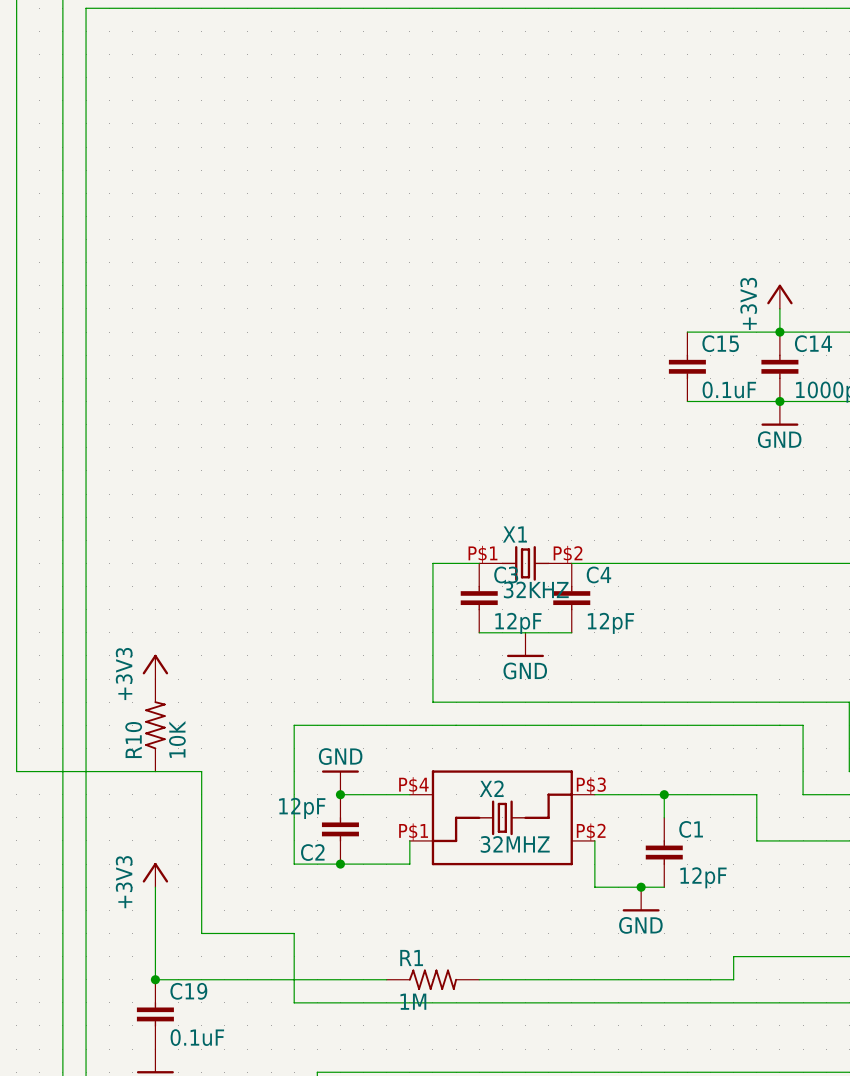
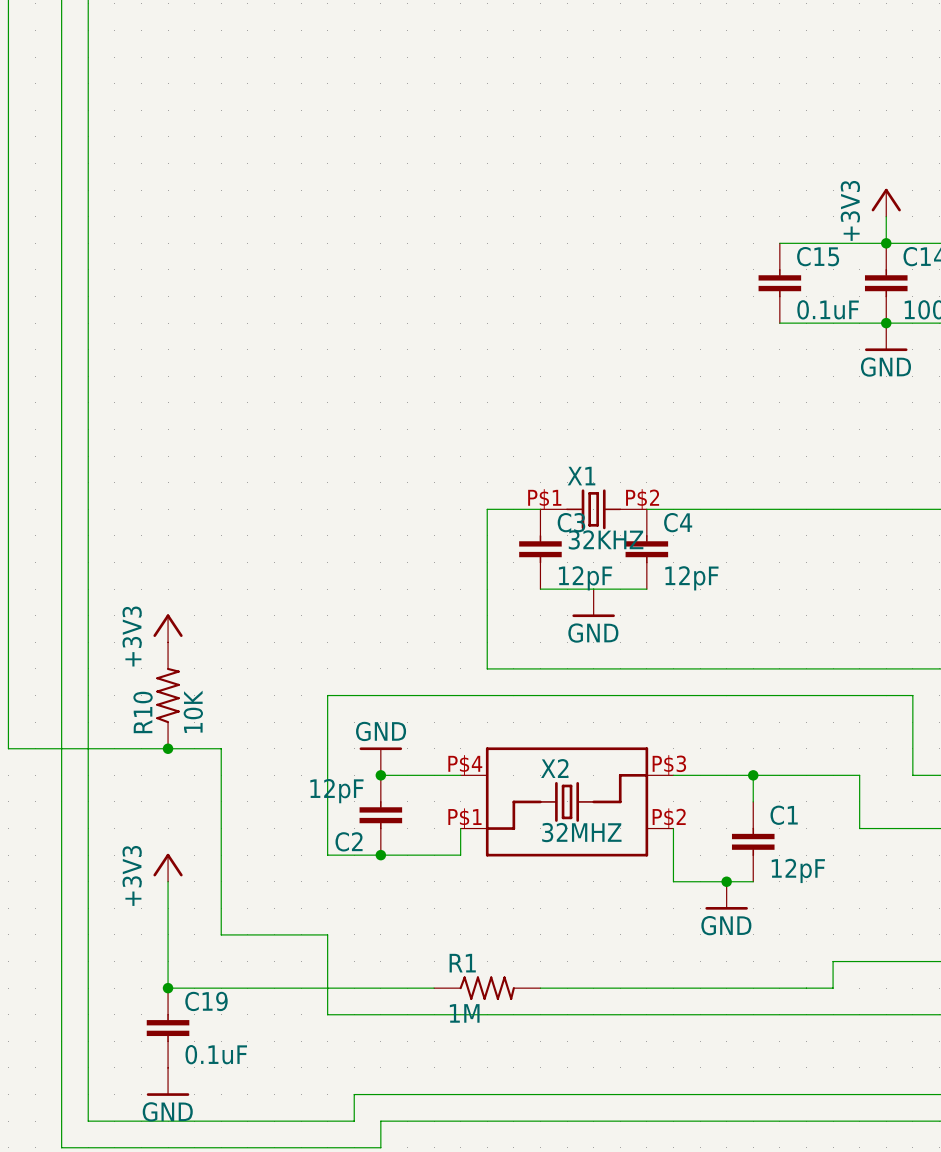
junction: none -> (168, 748)

